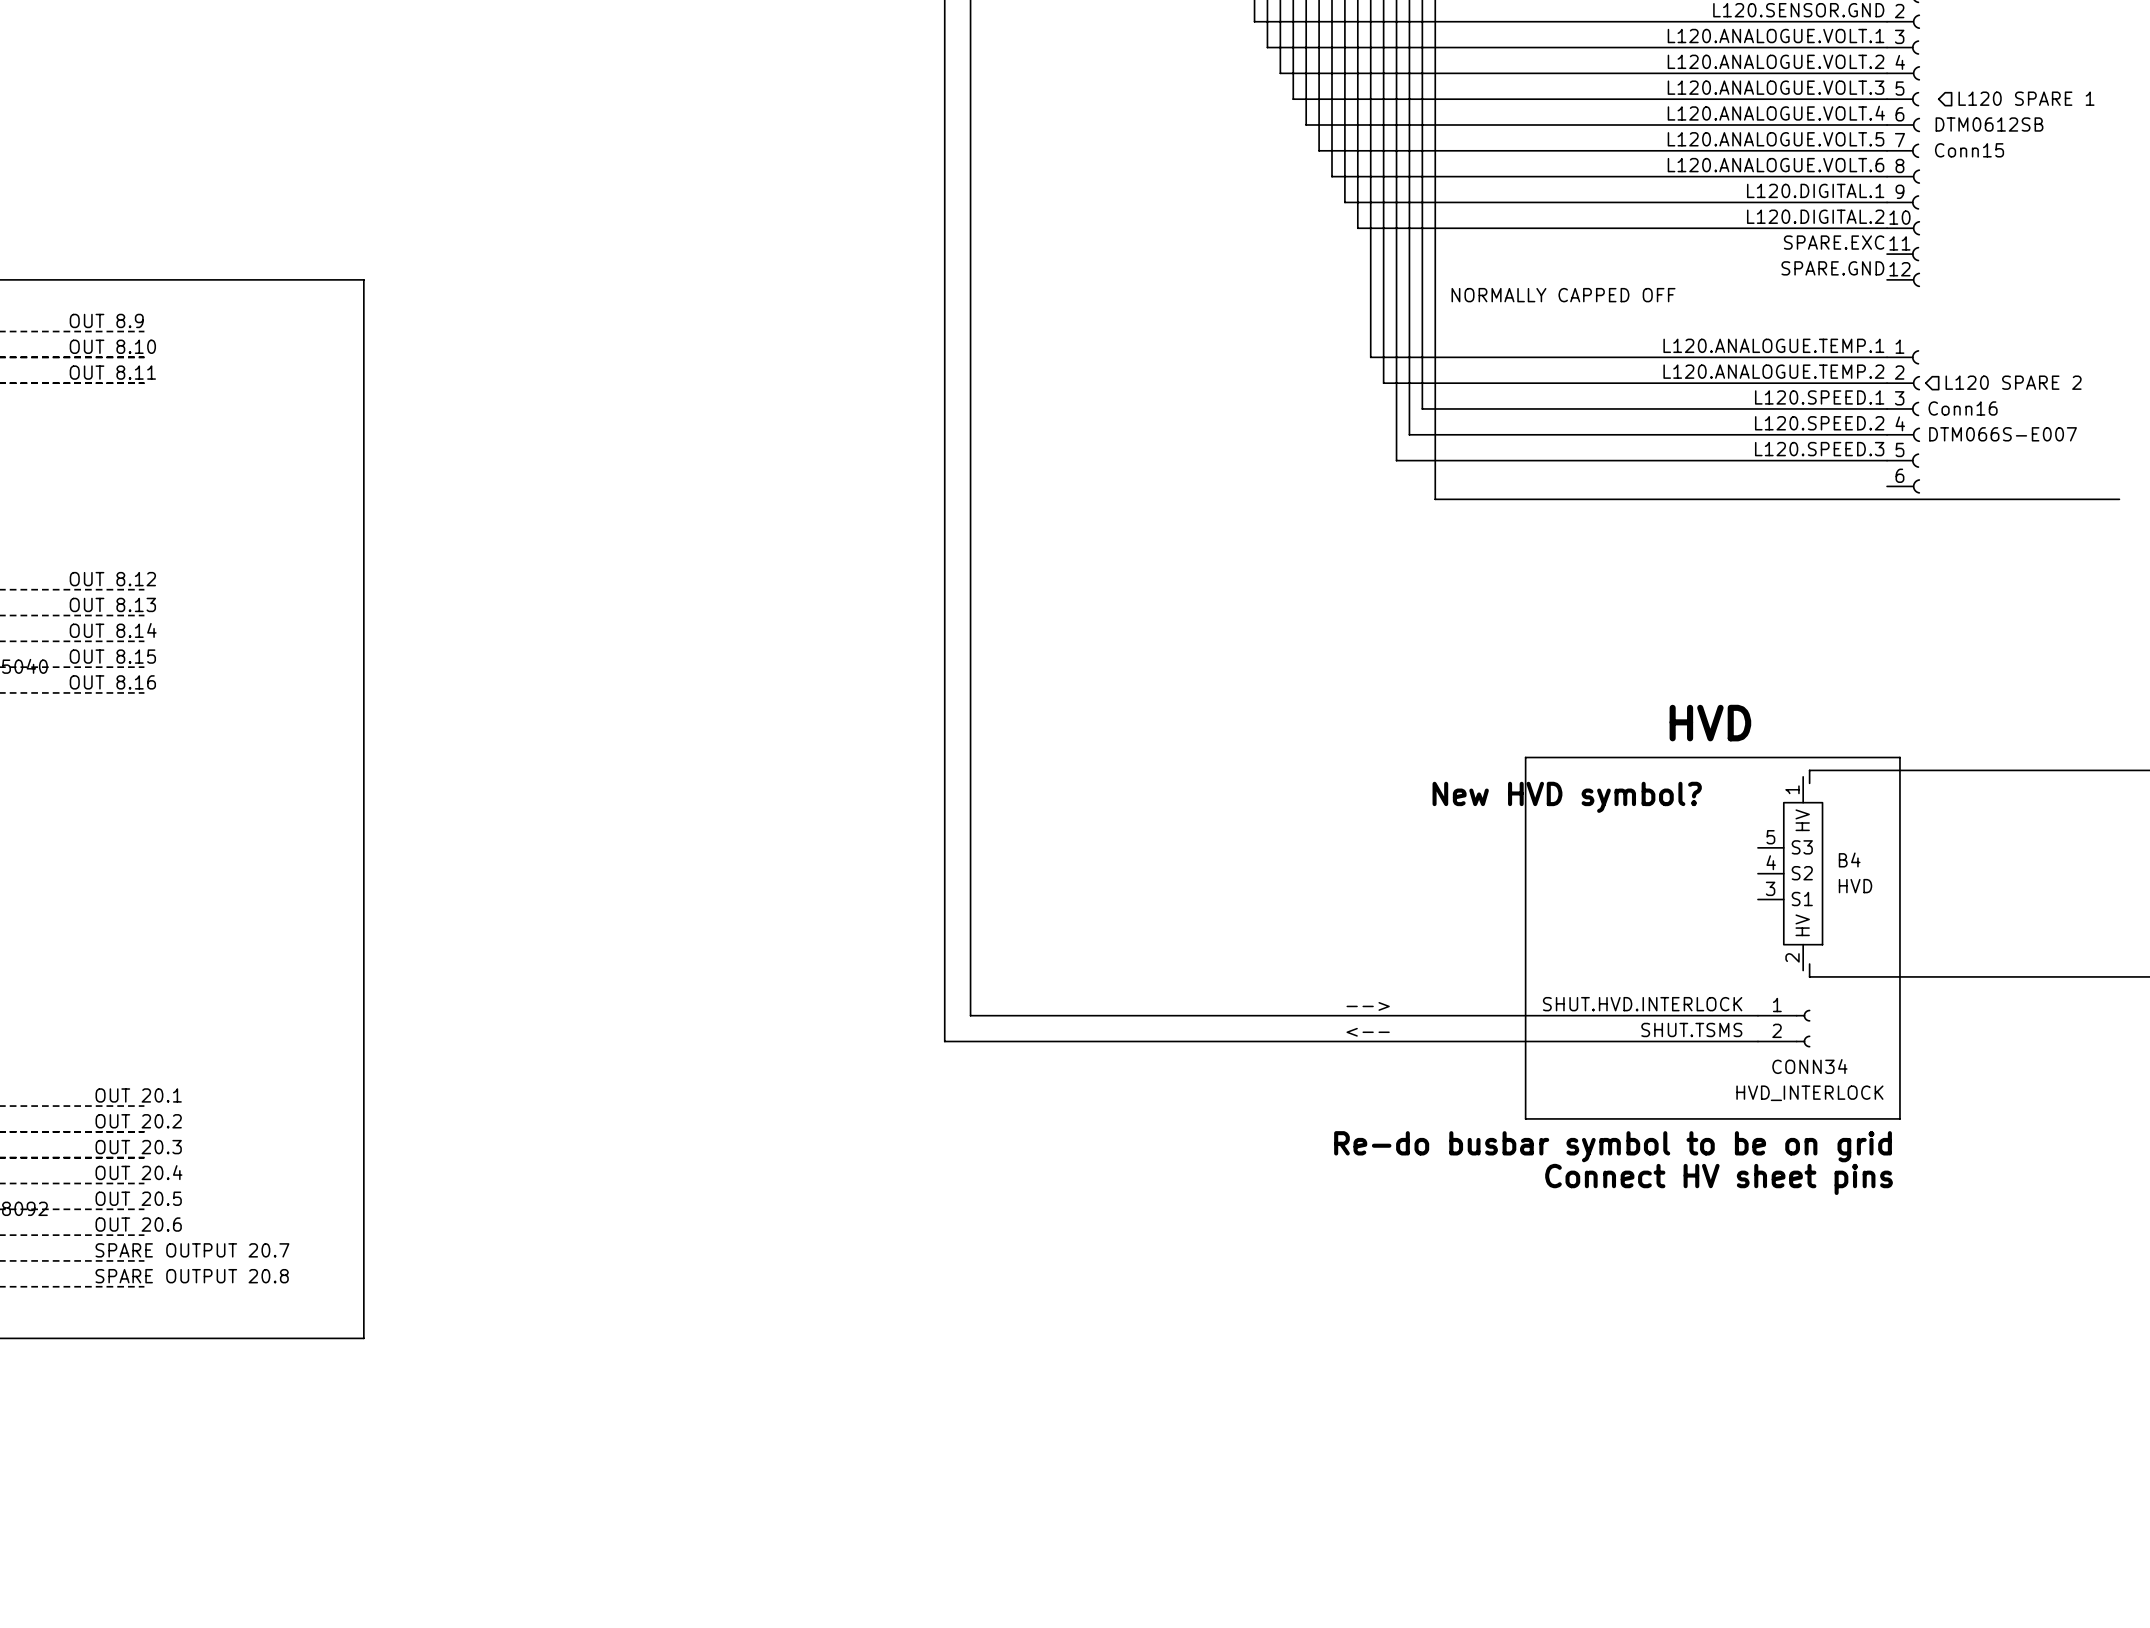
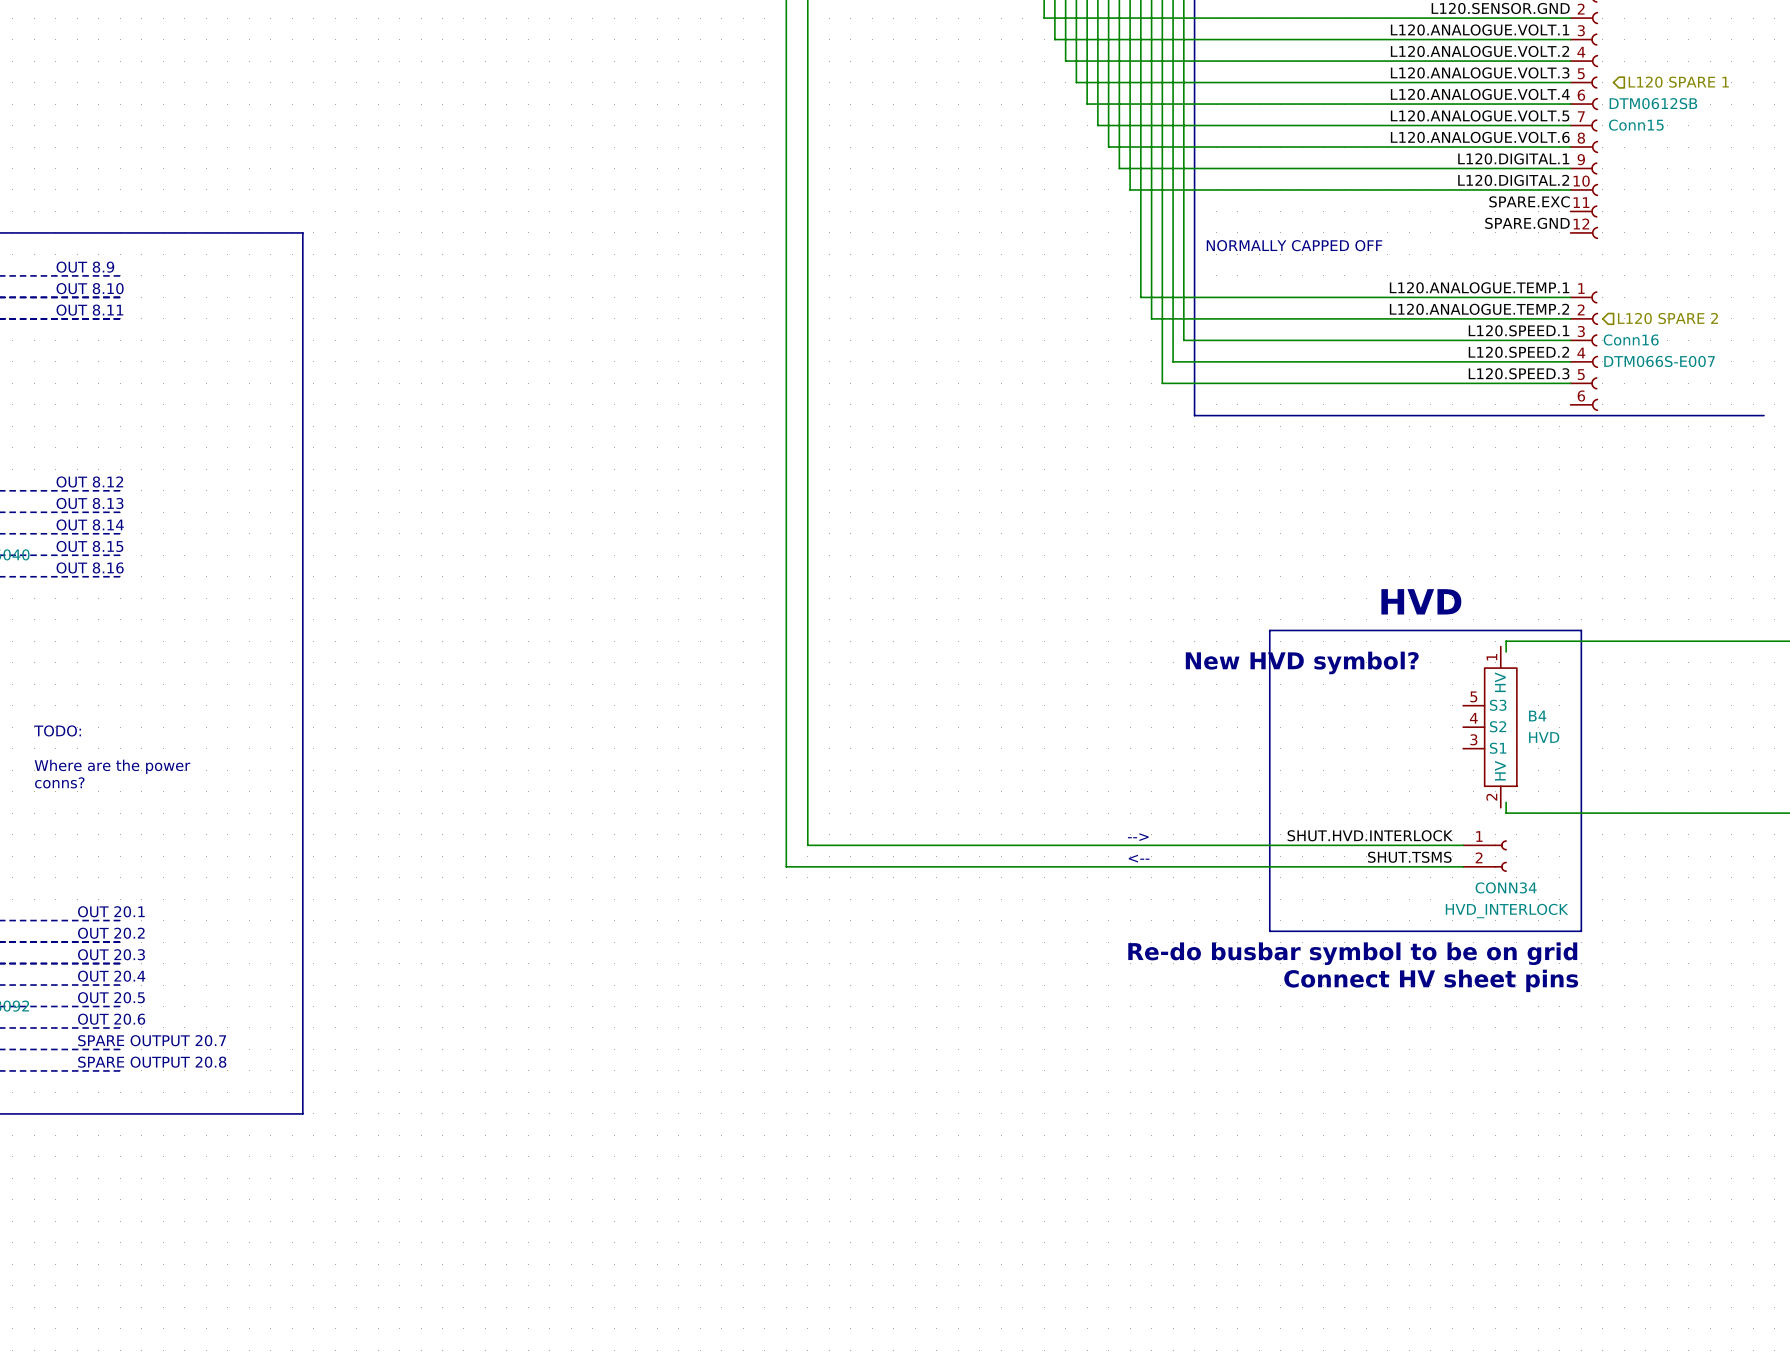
text: none -> TODO: (57, 730)
text: none -> Where are the power (112, 766)
text: none -> conns? (59, 782)

